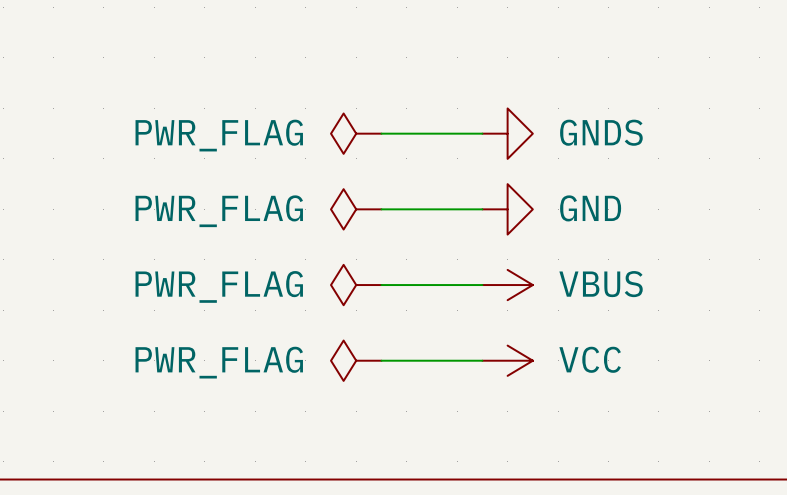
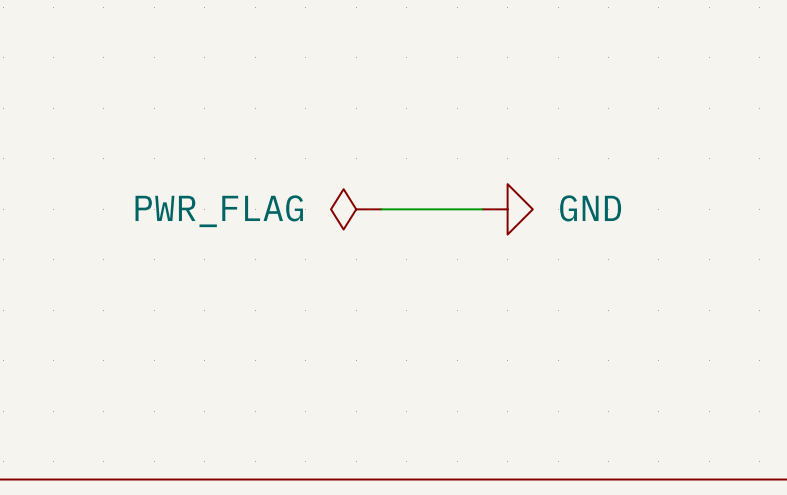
power symbol: PWR_FLAG (356, 133) -> none
wire: (381, 133) (482, 133) -> none
power symbol: GNDS (507, 133) -> none
power symbol: PWR_FLAG (356, 285) -> none
wire: (381, 285) (482, 285) -> none
power symbol: VBUS (507, 285) -> none
power symbol: PWR_FLAG (356, 360) -> none
wire: (381, 360) (482, 360) -> none
power symbol: VCC (507, 360) -> none

